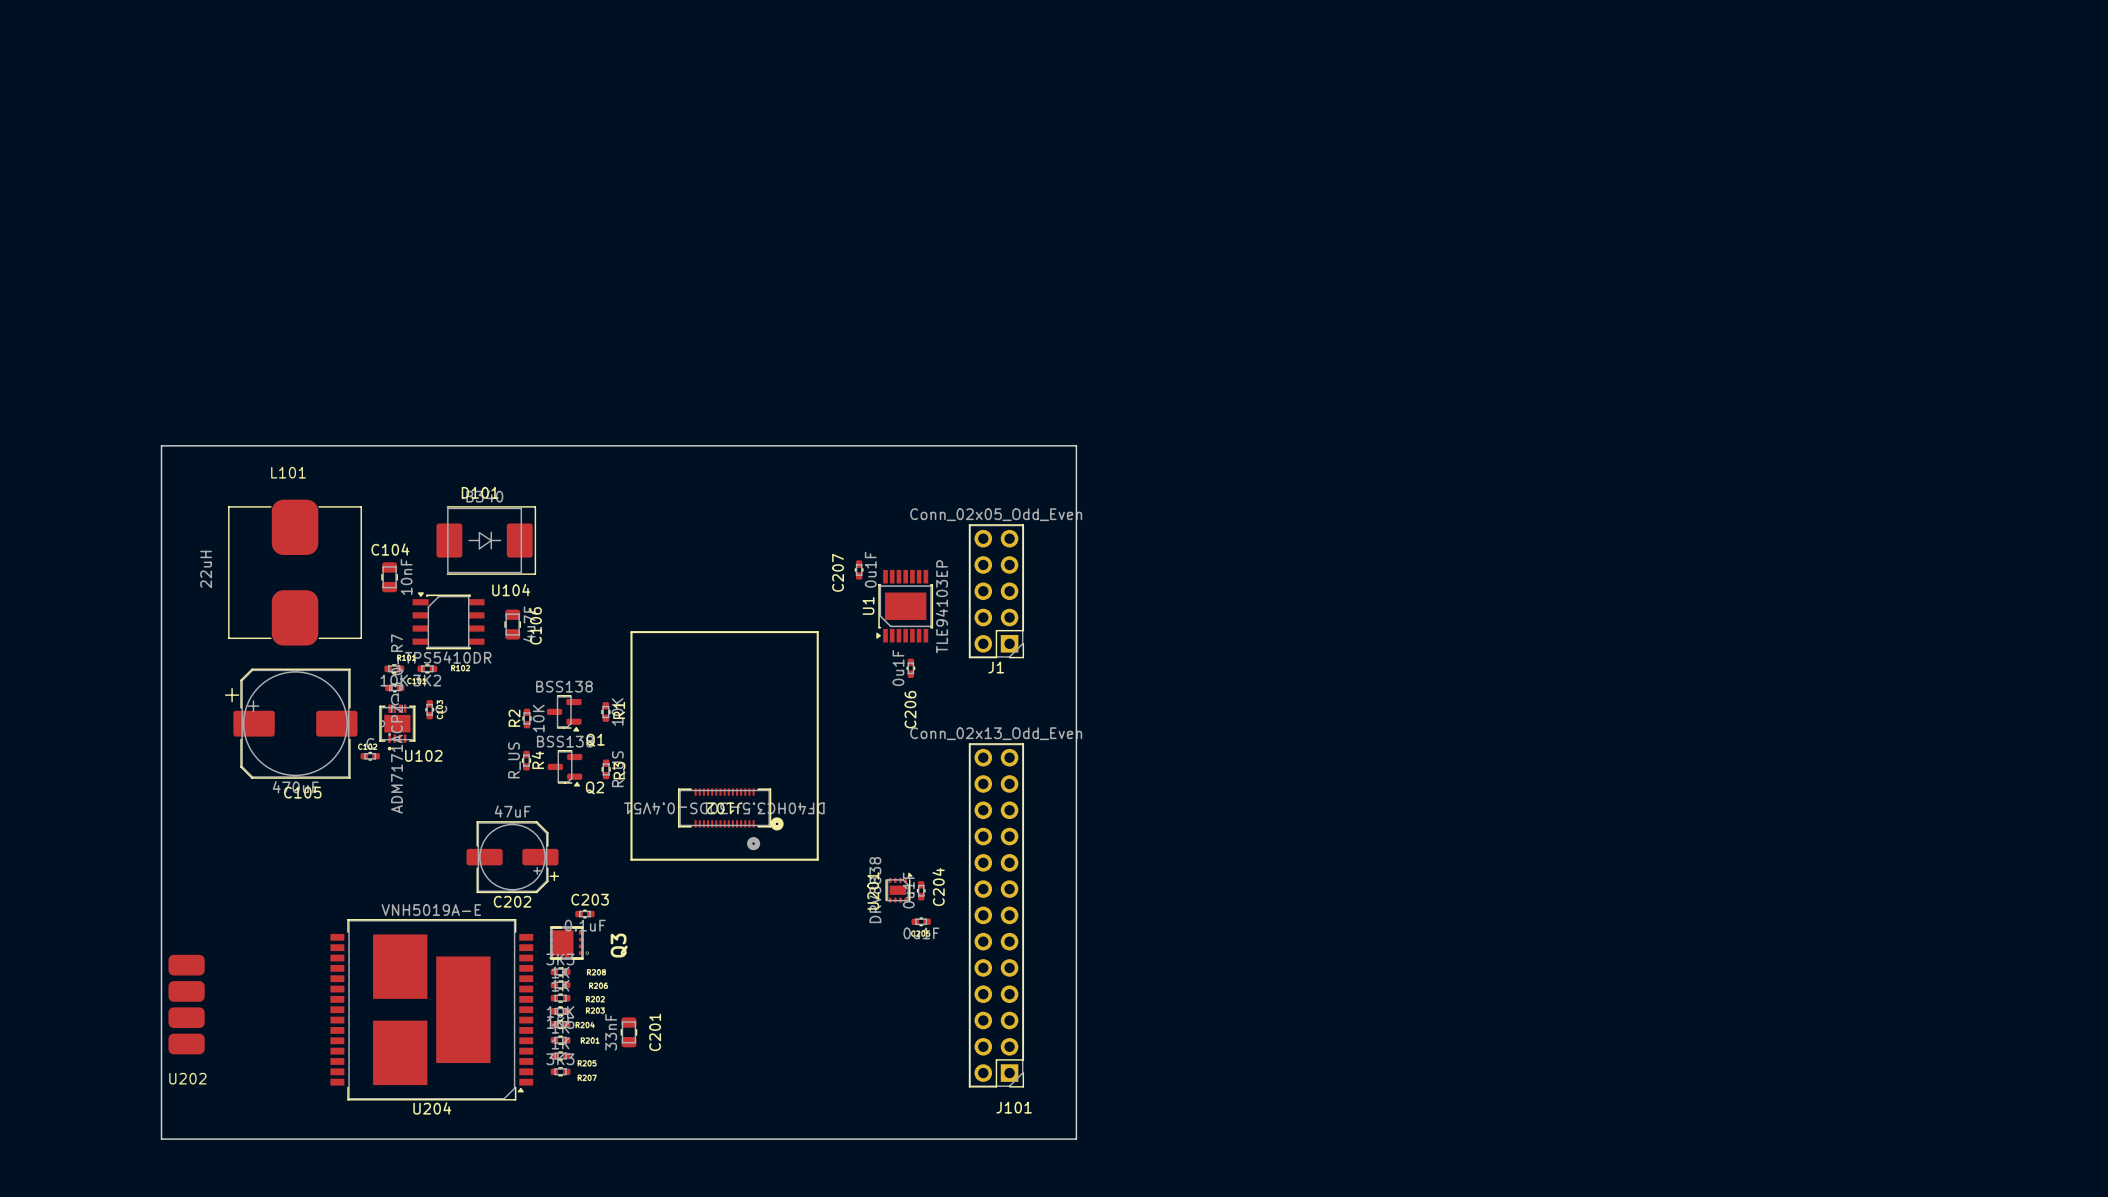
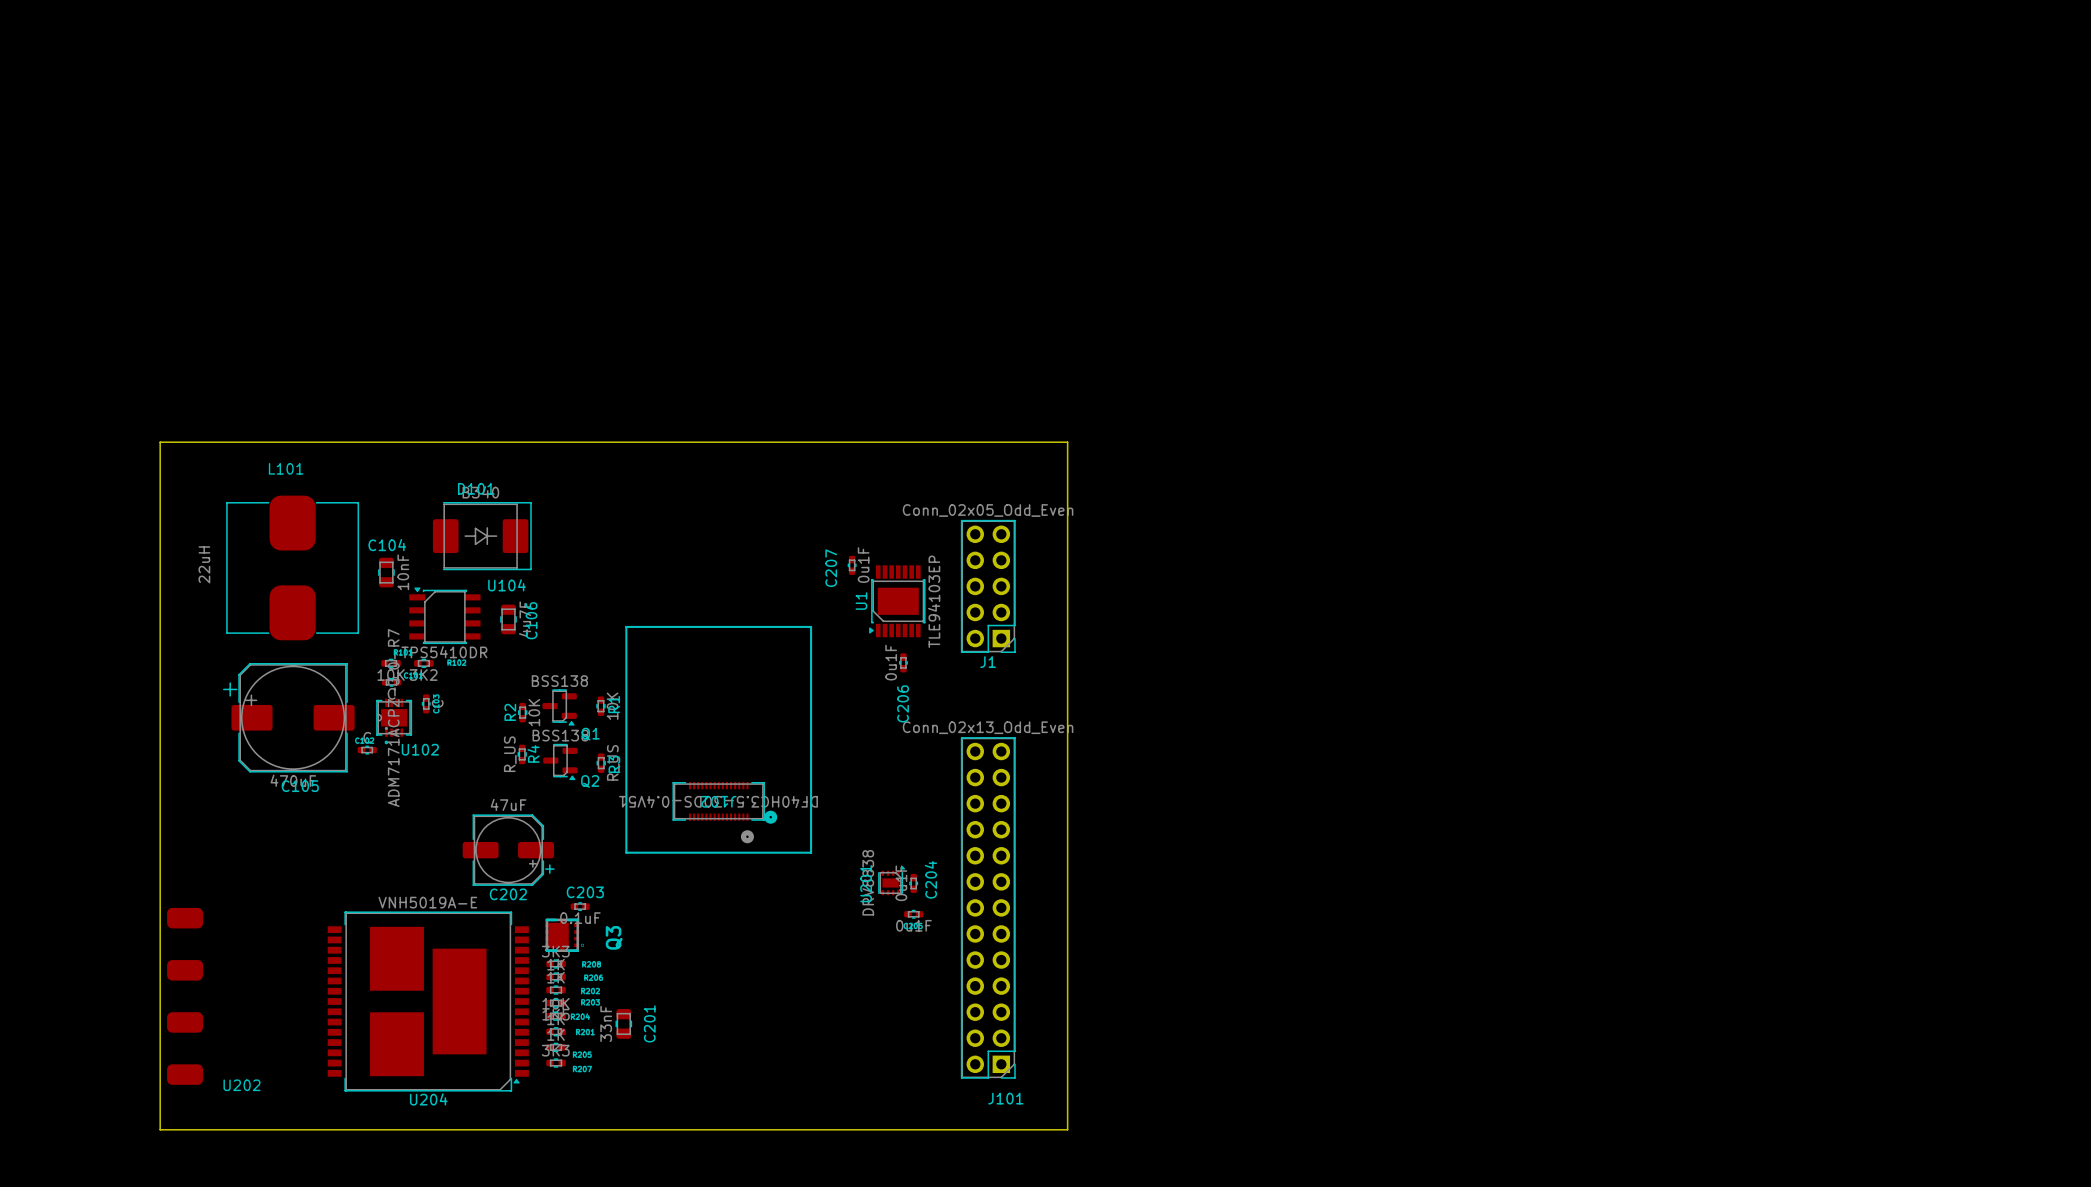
U202 footprint: [168, 954, 205, 1055] -> [167, 907, 204, 1085]
U202 name position: U202 (187, 1078) -> U202 (242, 1085)

